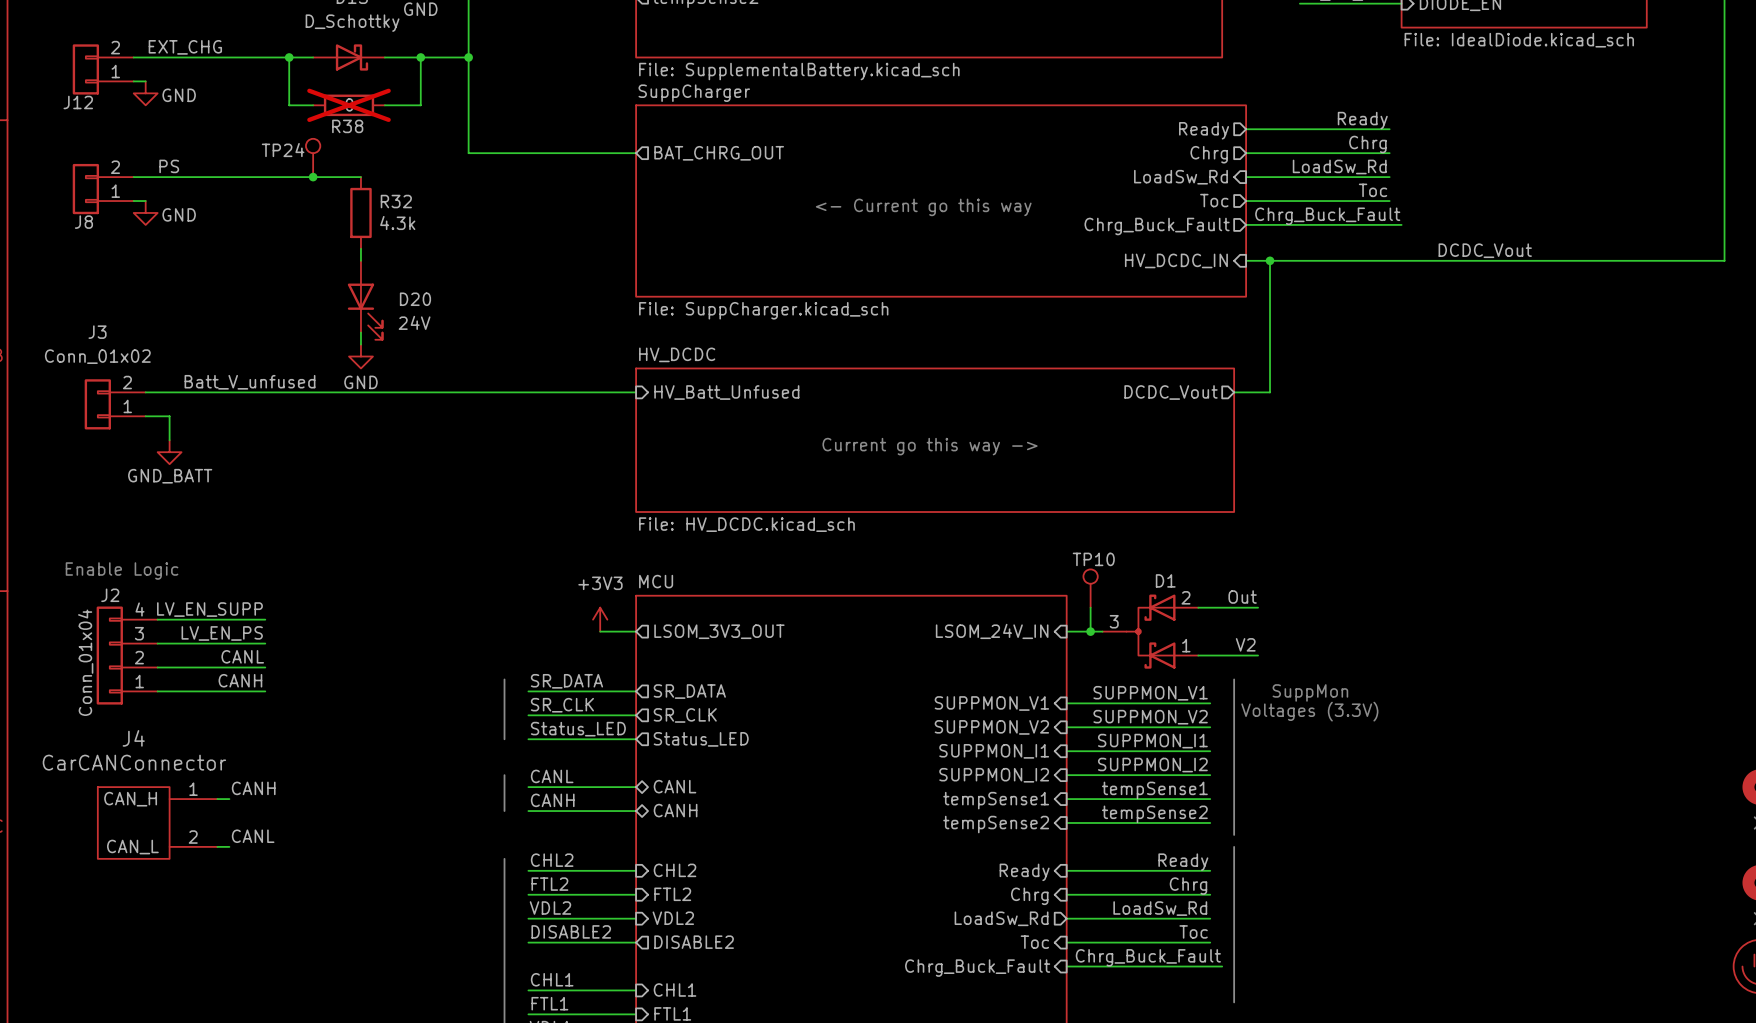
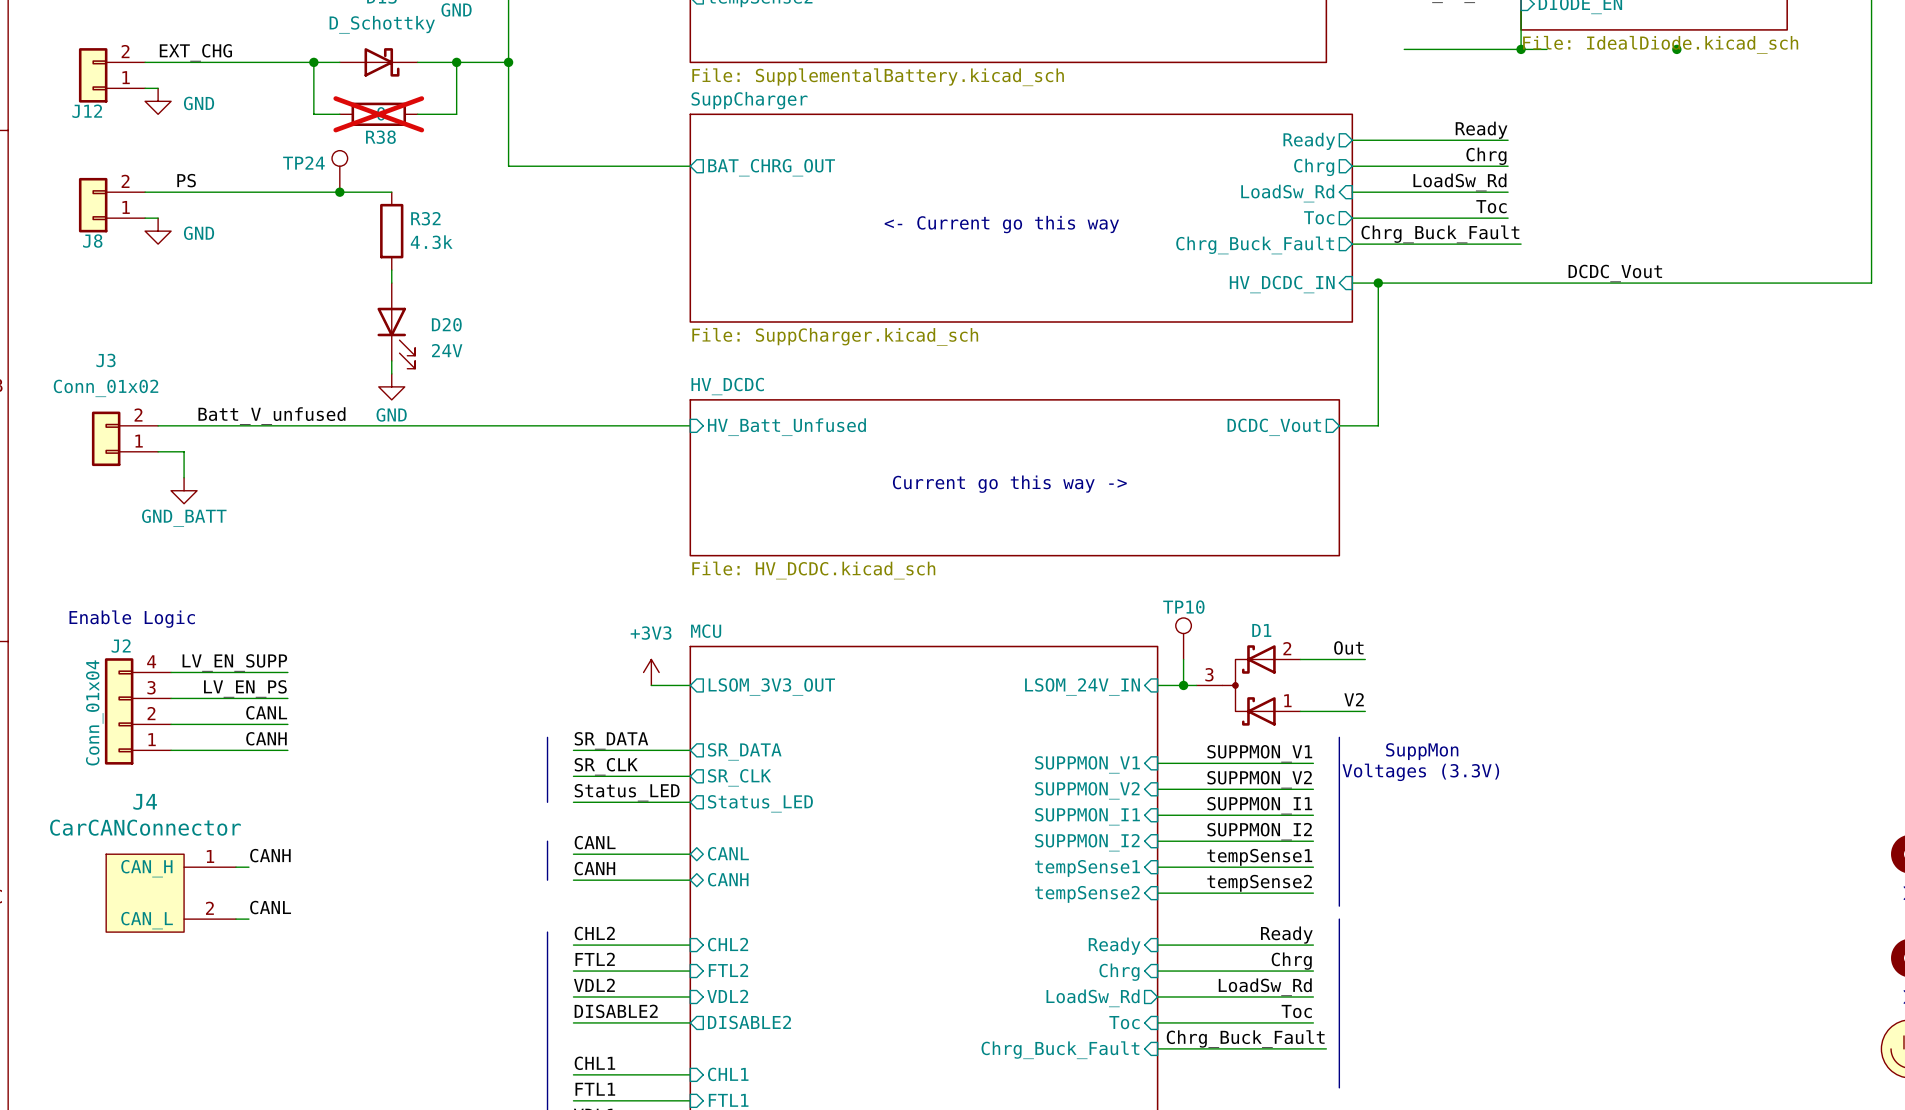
wire: (1299, 3) (1401, 3) -> none
wire: none -> (1521, 10) (1521, 49)
wire: none -> (1404, 49) (1547, 49)
junction: none -> (1521, 49)
junction: none -> (1676, 49)

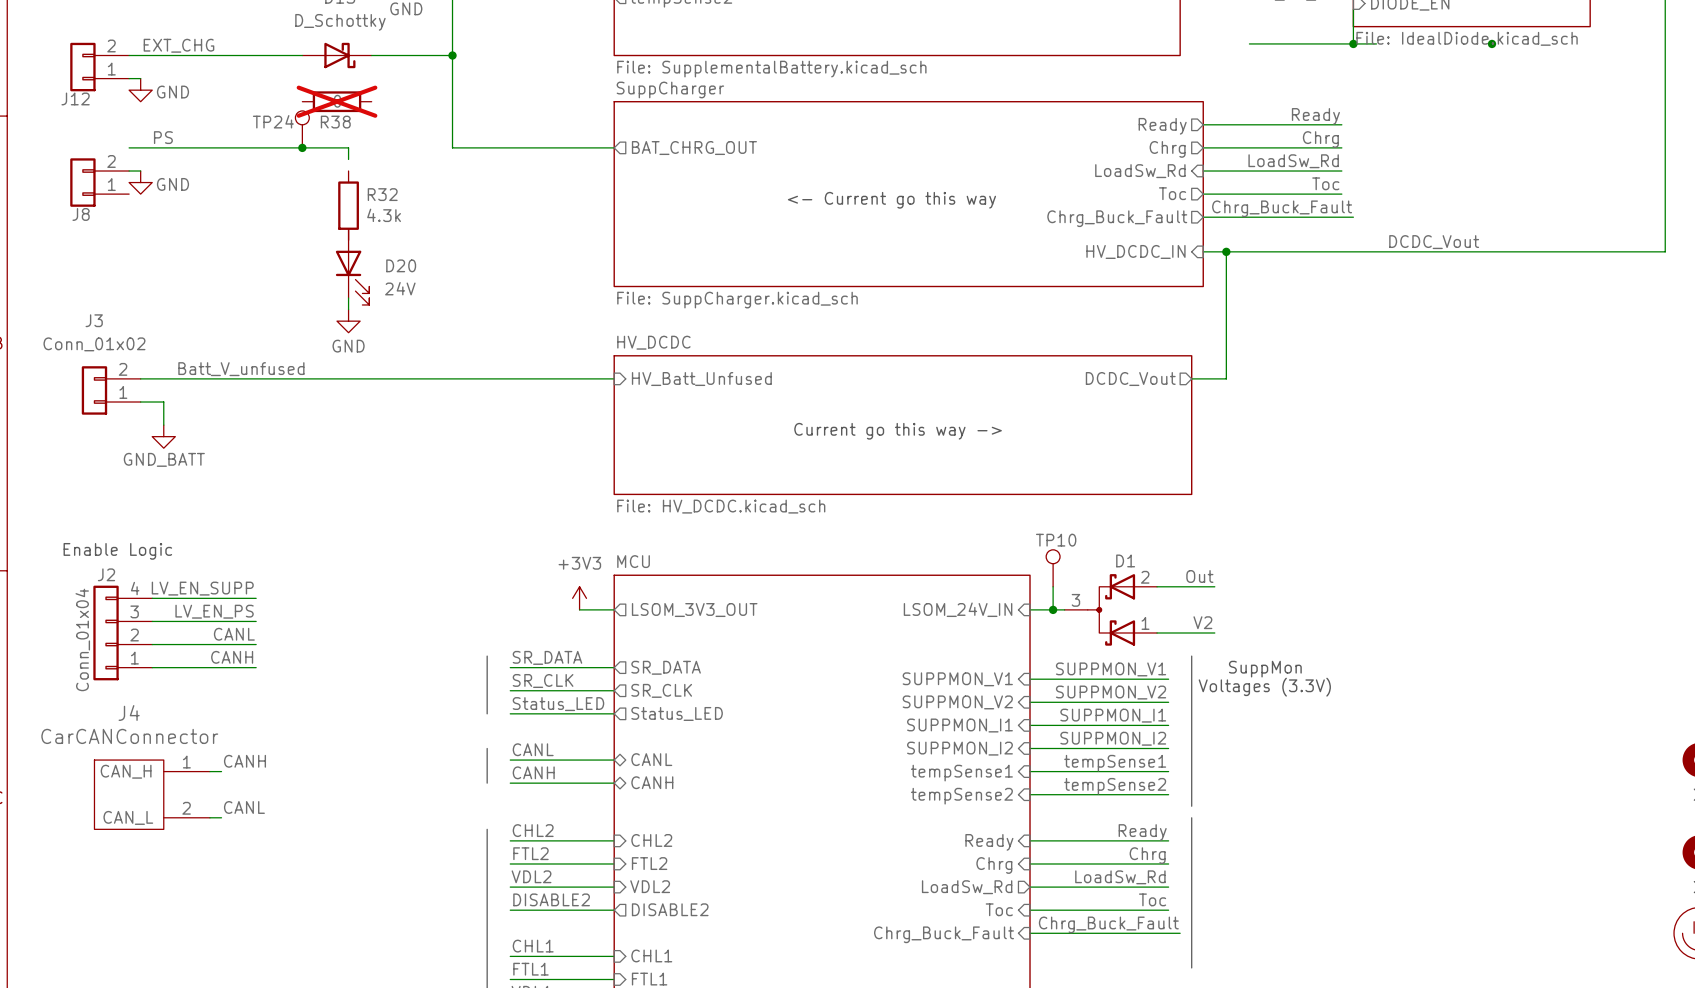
wire: (313, 62) (313, 114) (339, 114) -> none
junction: (313, 62) -> none
wire: (456, 62) (456, 114) (417, 114) -> none
junction: (456, 62) -> none
wire: none -> (129, 147) (348, 147) (348, 159)
TP24 position: (339, 171) -> (302, 129)
label position: PS (186, 180) -> PS (163, 137)
wire: (158, 192) (391, 192) -> none
junction position: (339, 192) -> (302, 147)
wire: (145, 218) (158, 218) -> none
power symbol position: GND (158, 231) -> GND (140, 182)
D20 position: (396, 325) -> (352, 266)
power symbol position: GND (391, 386) -> GND (348, 321)

